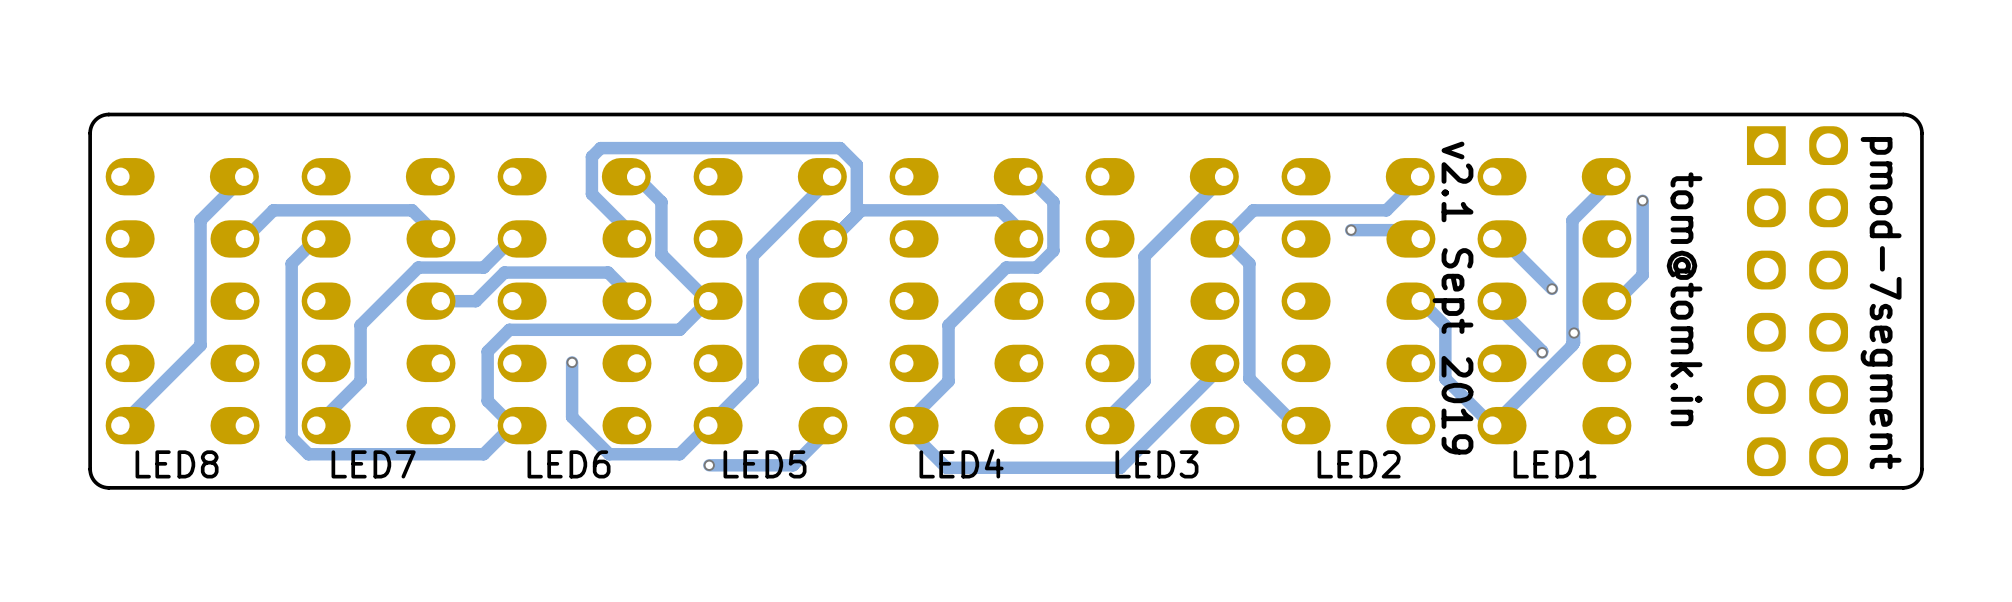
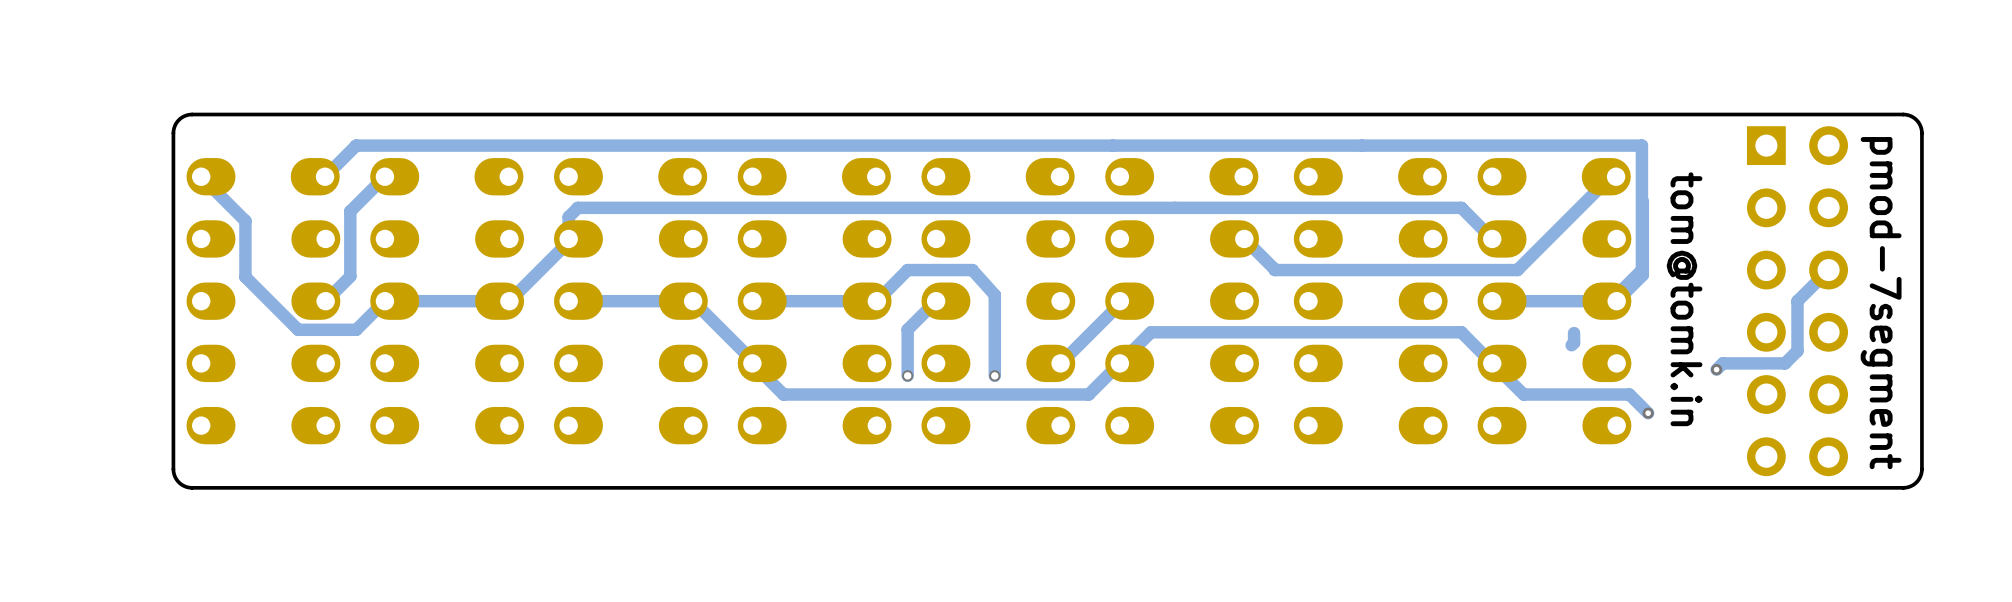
board edge: (192, 114) (106, 114) (95, 119) (90, 133) (90, 474) (97, 483) (106, 487) (192, 487) -> (192, 114) (178, 119) (173, 133) (173, 469) (178, 482) (192, 487)
part footprint: [1746, 126, 1849, 477] -> [1746, 126, 1849, 477]
track: none -> (201, 176) (245, 220) (245, 277) (298, 329) (356, 329) (384, 301) (440, 301)
track: (244, 176) (200, 220) (200, 345) (120, 425) -> none
track: none -> (384, 176) (350, 211) (350, 276) (325, 301)
track: (636, 176) (661, 201) (661, 254) (708, 301) (679, 329) (509, 329) (487, 351) (487, 400) (512, 425) (483, 454) (308, 454) (291, 437) (291, 263) (316, 238) -> none
track: (832, 176) (752, 256) (752, 381) (679, 454) (609, 454) (572, 417) (572, 362) -> none
track: (1028, 176) (1053, 201) (1053, 250) (1036, 267) (1006, 267) (948, 325) (948, 381) (904, 425) (946, 467) (1120, 467) (1224, 363) -> none
track: (1224, 176) (1144, 256) (1144, 381) (1100, 425) -> none
track: (1420, 176) (1386, 210) (1253, 210) (1224, 238) (1249, 263) (1249, 378) (1296, 425) -> none
track: none -> (1610, 176) (1517, 270) (1274, 270) (1244, 238)
track: (1616, 176) (1572, 220) (1572, 345) (1492, 425) (1445, 378) (1445, 325) (1420, 301) -> none
via: (1642, 200) -> none
track: (856, 214) (856, 164) (840, 148) (600, 148) (591, 156) (591, 194) (636, 238) -> none
track: (1351, 230) (1411, 230) (1420, 238) -> none
via: (1351, 230) -> none
track: (440, 238) (412, 210) (273, 210) (244, 238) -> none
track: (512, 238) (483, 267) (418, 267) (360, 325) (360, 381) (316, 425) -> none
track: (1028, 238) (1000, 210) (861, 210) (832, 238) -> none
track: (1492, 238) (1502, 238) (1552, 288) -> none
track: none -> (1828, 270) (1797, 301) (1797, 350) (1785, 363) (1722, 363) (1716, 369)
via: (1552, 288) -> none
text: v2.1 Sept 2019 (1452, 298) -> none
LED8: (182, 301) -> none
part: none -> (263, 301)
LED7: (378, 301) -> none
part: none -> (447, 301)
track: none -> (568, 301) (693, 301) (783, 394) (1088, 394) (1150, 332) (1461, 332) (1523, 394) (1629, 394) (1648, 413)
LED6: (574, 301) -> none
part: none -> (630, 301)
track: (636, 301) (608, 272) (504, 272) (475, 301) -> (1492, 238) (1461, 207) (577, 207) (568, 217) (568, 241) (509, 301) (475, 301)
track: none -> (752, 301) (876, 301) (907, 270) (972, 270) (994, 294) (994, 375)
LED5: (770, 301) -> none
part: none -> (814, 301)
track: none -> (936, 301) (907, 329) (907, 375)
LED4: (966, 301) -> none
part: none -> (998, 301)
track: none -> (1119, 301) (1119, 304) (1060, 363)
LED3 position: (1162, 301) -> (1182, 301)
LED2 position: (1358, 301) -> (1370, 301)
track: (1492, 301) (1542, 352) -> (1492, 301) (1610, 301) (1641, 270) (1641, 145) (356, 145) (325, 176)
via: (1574, 333) -> none
via: (1542, 352) -> none
via: (572, 362) -> none
via: none -> (1716, 369)
via: none -> (907, 375)
via: none -> (994, 375)
via: none -> (1648, 413)
track: (832, 425) (793, 465) (709, 465) -> none
LED3 name: LED3 (1156, 464) -> none
LED2 name: LED2 (1359, 464) -> none
LED1 name: LED1 (1555, 464) -> none
via: (709, 465) -> none

